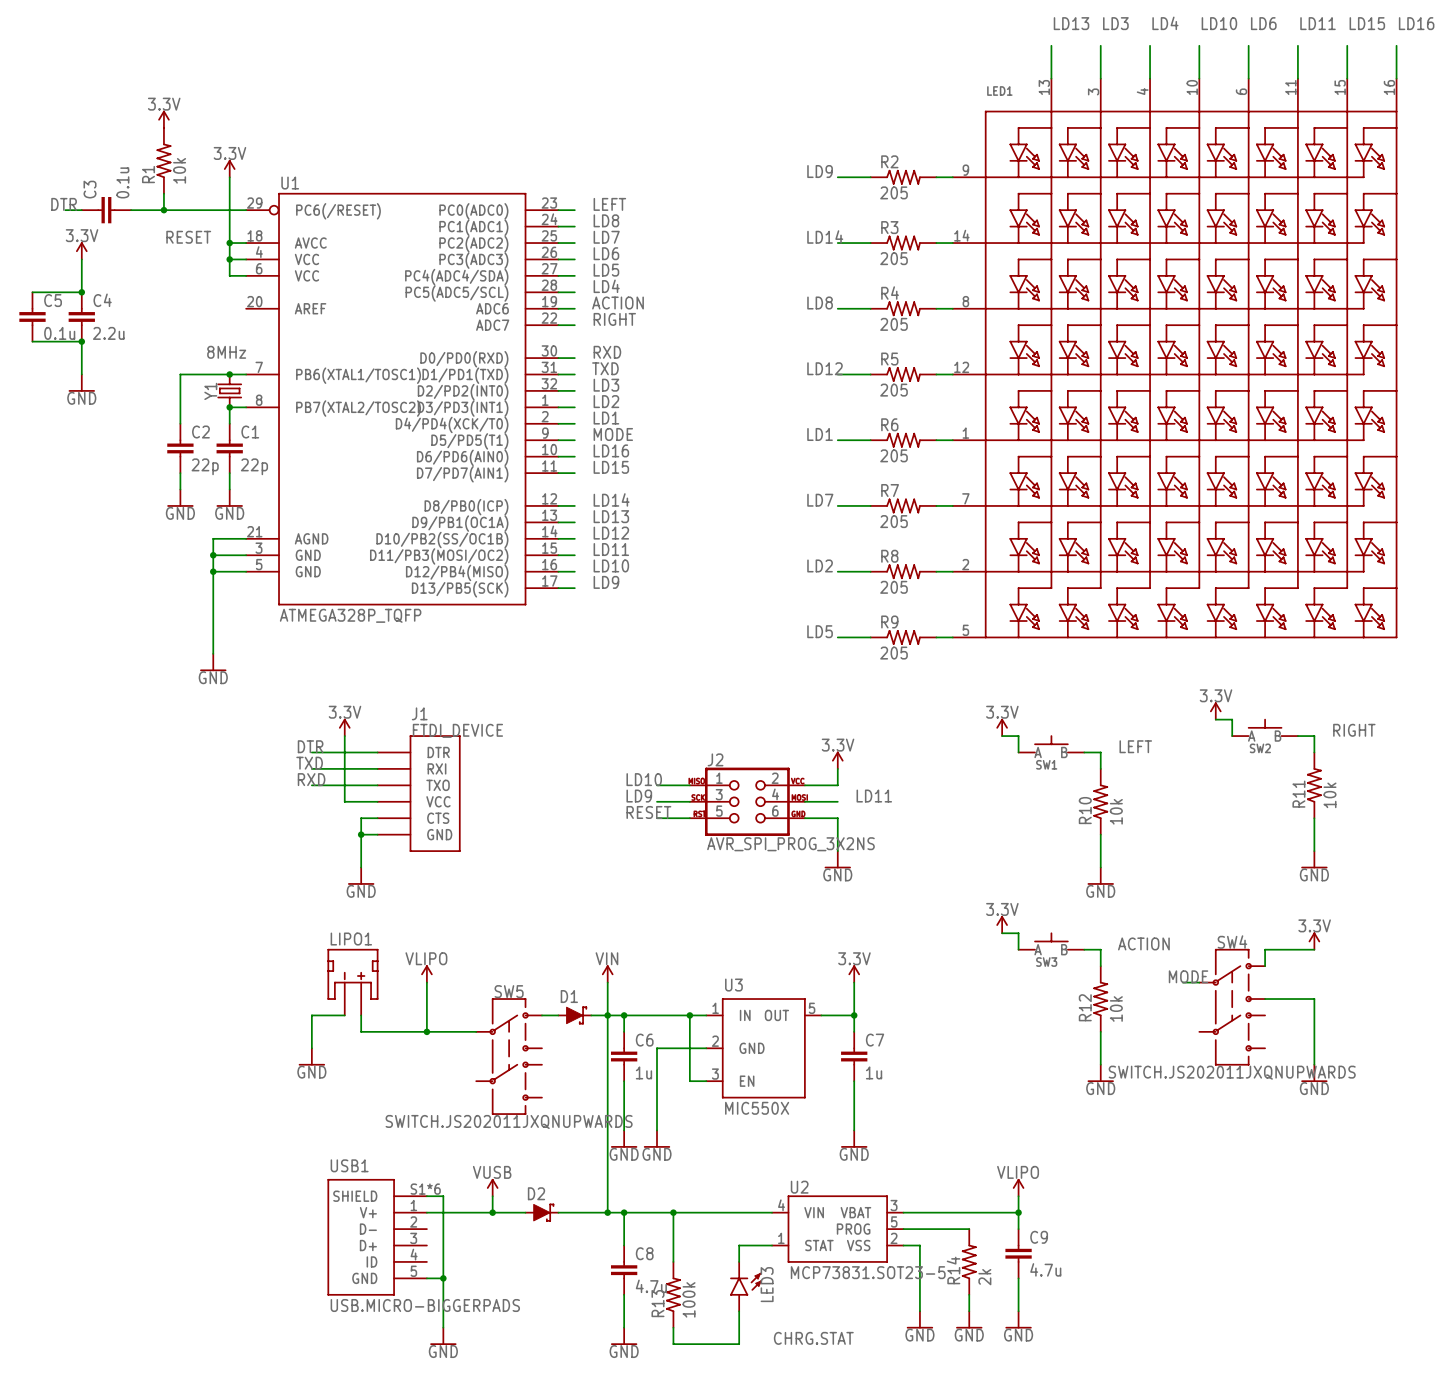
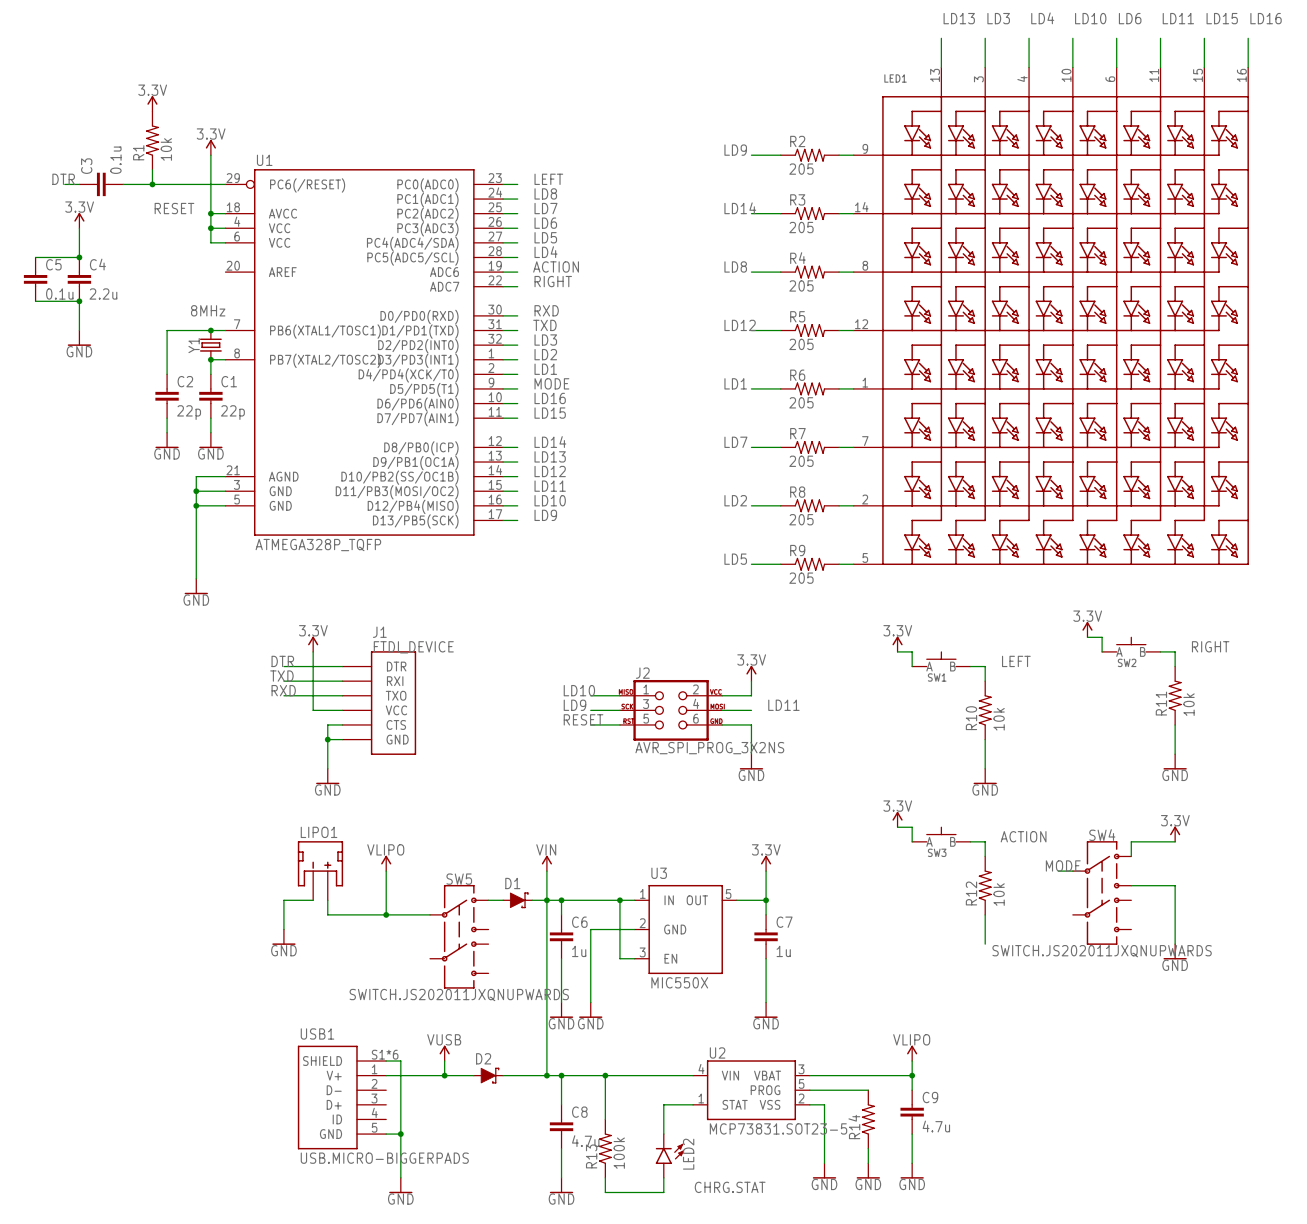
power symbol: GND (1100, 1073) -> none
R14 value: 2k (984, 1277) -> none
LED3: (745, 1286) -> none
LED2: none -> (669, 1155)

